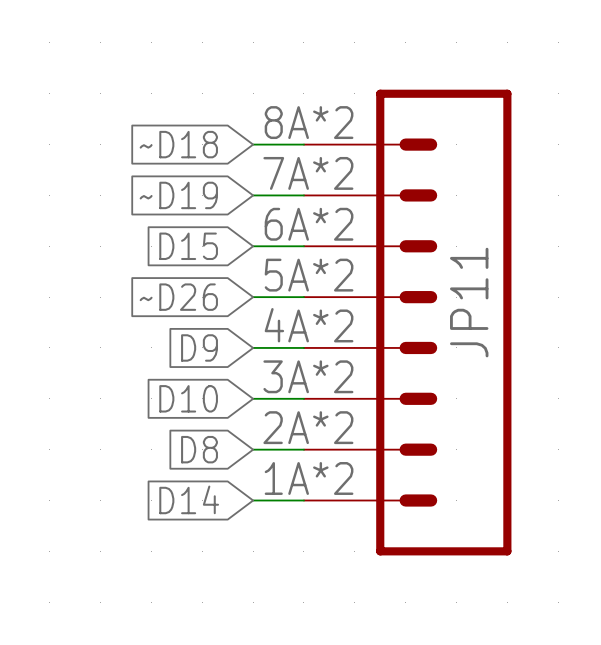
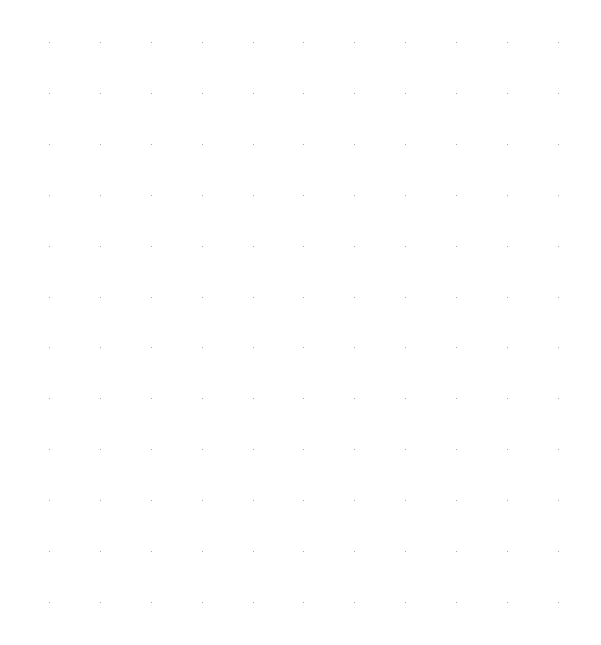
global label: ~D18 (178, 144) -> none
wire: (253, 144) (303, 144) -> none
global label: ~D19 (178, 195) -> none
wire: (253, 195) (303, 195) -> none
global label: D15 (188, 246) -> none
wire: (253, 246) (303, 246) -> none
global label: ~D26 (178, 297) -> none
wire: (253, 297) (303, 297) -> none
part: JP11 (407, 322) -> none
global label: D9 (199, 347) -> none
wire: (253, 347) (303, 347) -> none
global label: D10 (188, 398) -> none
wire: (253, 398) (303, 398) -> none
global label: D8 (199, 449) -> none
wire: (253, 449) (303, 449) -> none
global label: D14 (189, 499) -> none
wire: (253, 500) (303, 500) -> none

